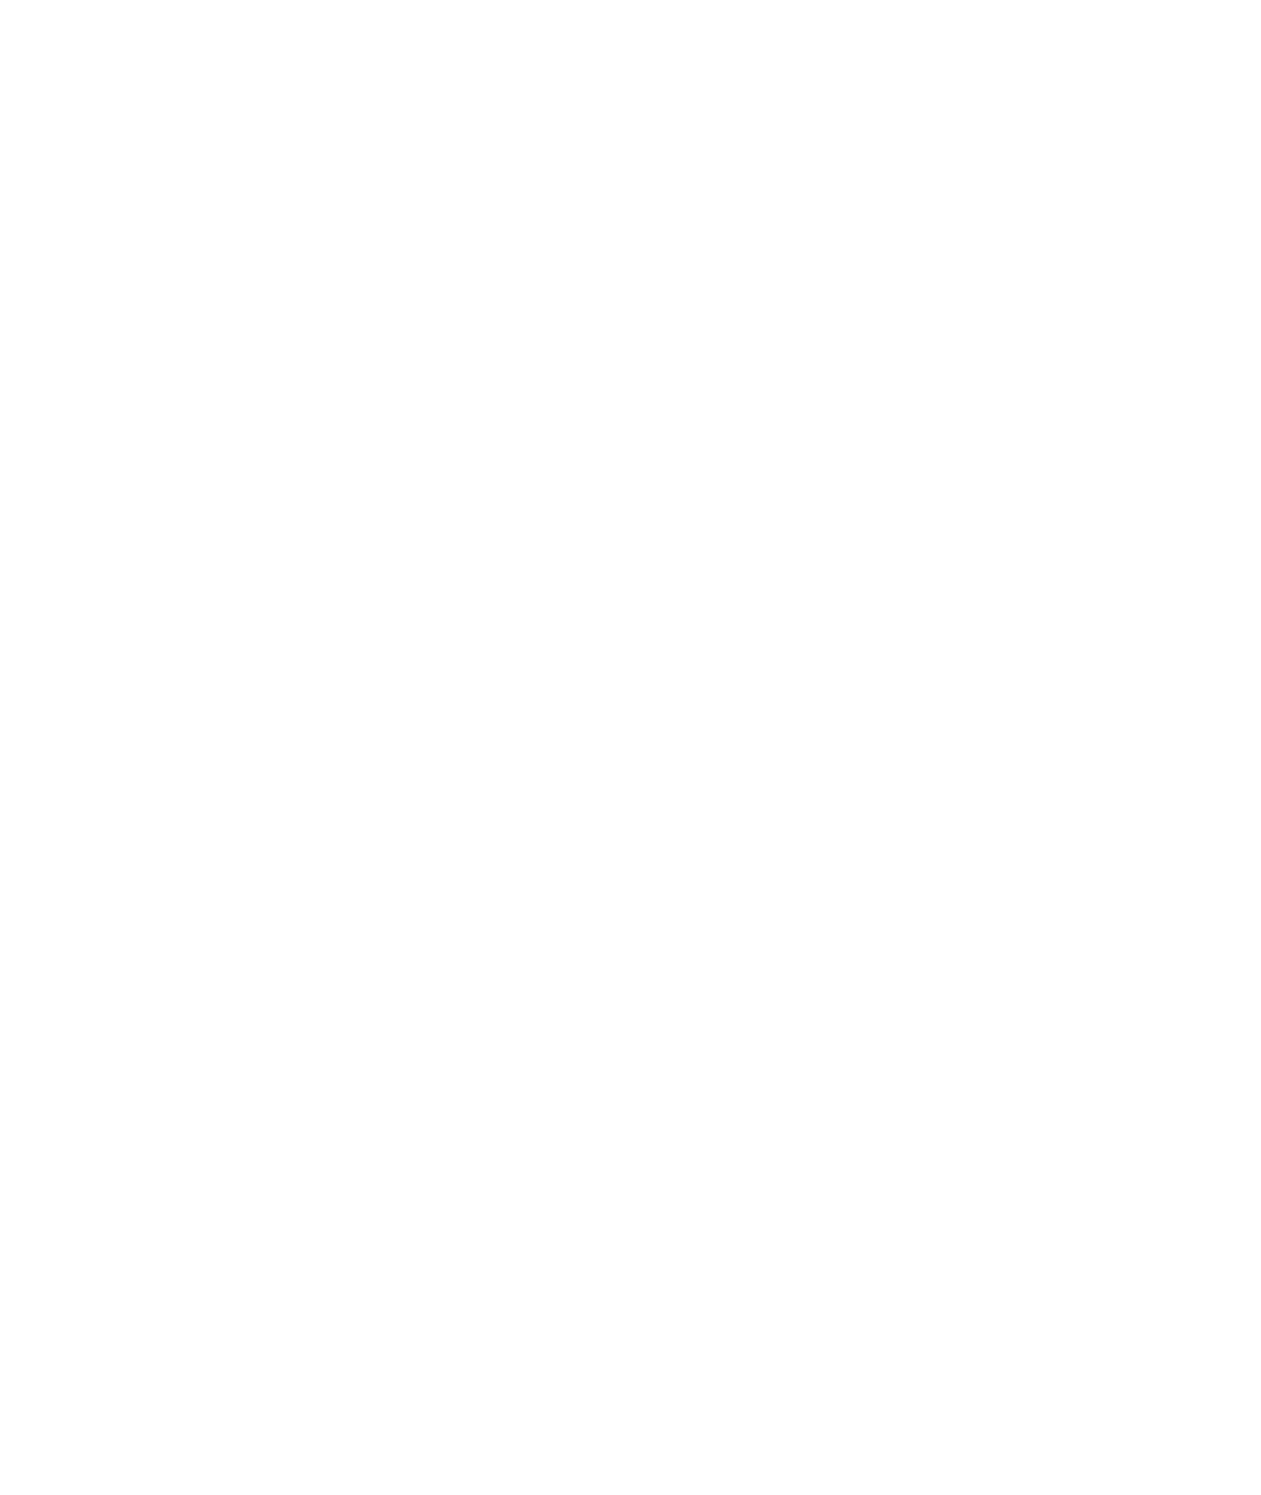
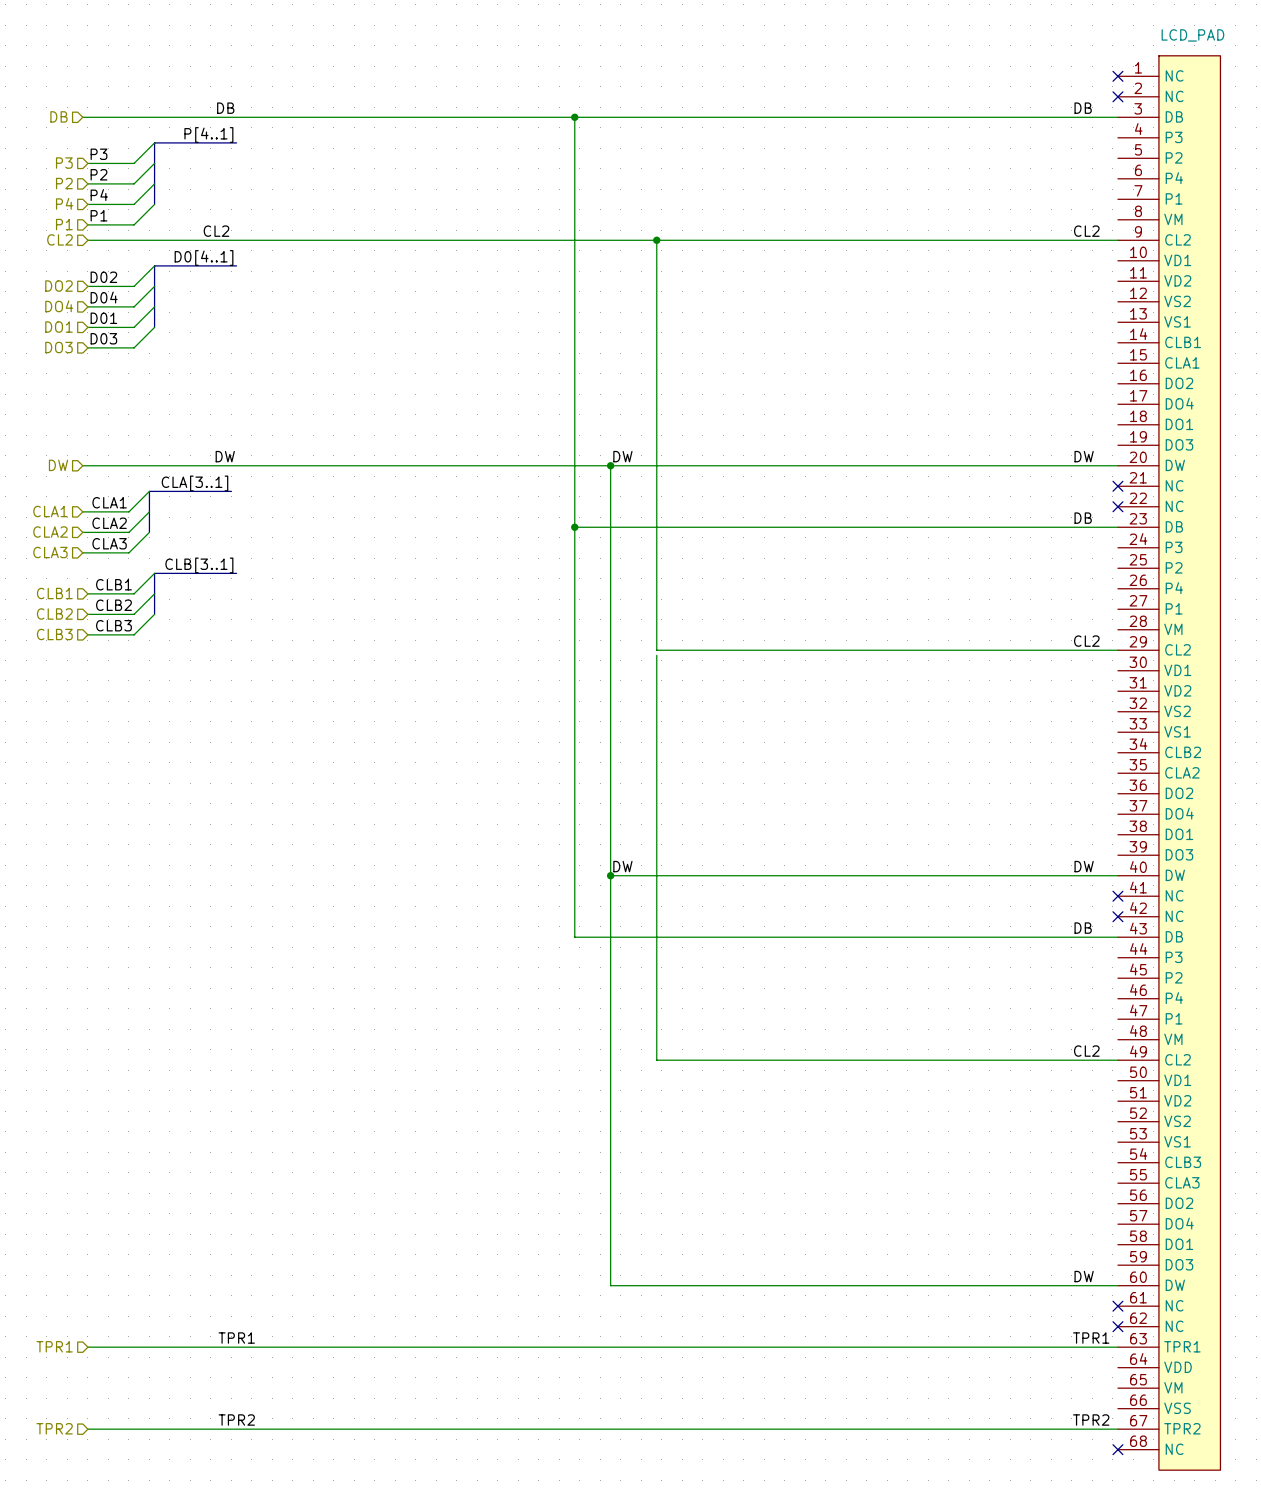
no-connect mark: none -> (1117, 76)
no-connect mark: none -> (1117, 96)
label: none -> DB (225, 108)
label: none -> DB (1083, 108)
hierarchical label: none -> DB (58, 116)
wire: none -> (82, 117) (1117, 117)
wire: none -> (574, 117) (574, 937) (1117, 937)
junction: none -> (574, 117)
label: none -> P[4..1] (208, 135)
wire: none -> (154, 142) (134, 163) (87, 163)
bus: none -> (236, 142) (154, 142) (154, 204)
label: none -> P3 (99, 154)
hierarchical label: none -> P3 (64, 163)
wire: none -> (154, 163) (134, 183) (87, 183)
label: none -> P2 (99, 174)
hierarchical label: none -> P2 (64, 183)
wire: none -> (154, 183) (134, 204) (87, 204)
label: none -> P4 (99, 195)
hierarchical label: none -> P4 (64, 203)
wire: none -> (154, 204) (134, 224) (87, 224)
label: none -> P1 (99, 215)
hierarchical label: none -> P1 (64, 224)
label: none -> CL2 (216, 231)
label: none -> CL2 (1086, 231)
hierarchical label: none -> CL2 (59, 239)
wire: none -> (87, 240) (1117, 240)
wire: none -> (656, 240) (656, 650) (1117, 650)
junction: none -> (656, 240)
label: none -> D0[4..1] (204, 257)
wire: none -> (154, 265) (134, 286) (87, 286)
bus: none -> (236, 265) (154, 265) (154, 327)
label: none -> D02 (103, 277)
hierarchical label: none -> DO2 (58, 286)
wire: none -> (154, 286) (134, 306) (87, 306)
label: none -> D04 (104, 297)
hierarchical label: none -> DO4 (59, 306)
wire: none -> (154, 306) (134, 327) (87, 327)
label: none -> D01 (103, 318)
hierarchical label: none -> DO1 (58, 327)
wire: none -> (154, 327) (134, 347) (87, 347)
label: none -> D03 (103, 338)
hierarchical label: none -> DO3 (58, 347)
label: none -> DW (225, 456)
label: none -> DW (622, 456)
label: none -> DW (1084, 456)
hierarchical label: none -> DW (58, 465)
wire: none -> (82, 465) (1117, 465)
wire: none -> (610, 465) (610, 1285) (1117, 1285)
junction: none -> (610, 465)
label: none -> CLA[3..1] (194, 483)
no-connect mark: none -> (1117, 486)
wire: none -> (149, 491) (128, 511) (82, 511)
bus: none -> (231, 491) (149, 491) (149, 532)
label: none -> CLA1 (109, 502)
no-connect mark: none -> (1117, 506)
hierarchical label: none -> CLA1 (50, 511)
wire: none -> (149, 511) (128, 532) (82, 532)
label: none -> DB (1083, 518)
label: none -> CLA2 (109, 523)
wire: none -> (574, 527) (1117, 527)
junction: none -> (574, 527)
hierarchical label: none -> CLA2 (50, 532)
wire: none -> (149, 532) (128, 552) (82, 552)
label: none -> CLA3 (109, 543)
hierarchical label: none -> CLA3 (50, 552)
label: none -> CLB[3..1] (199, 565)
wire: none -> (154, 573) (134, 593) (87, 593)
bus: none -> (236, 573) (154, 573) (154, 614)
label: none -> CLB1 (113, 584)
hierarchical label: none -> CLB1 (54, 593)
wire: none -> (154, 593) (134, 614) (87, 614)
label: none -> CLB2 (113, 605)
hierarchical label: none -> CLB2 (54, 613)
wire: none -> (154, 614) (134, 634) (87, 634)
label: none -> CLB3 (113, 625)
hierarchical label: none -> CLB3 (54, 634)
label: none -> CL2 (1086, 641)
wire: none -> (656, 655) (656, 1060) (1117, 1060)
LCD_PAD: none -> (1169, 762)
label: none -> DW (622, 866)
label: none -> DW (1084, 866)
wire: none -> (610, 875) (1117, 875)
junction: none -> (610, 875)
no-connect mark: none -> (1117, 896)
no-connect mark: none -> (1117, 916)
label: none -> DB (1083, 928)
label: none -> CL2 (1086, 1051)
label: none -> DW (1084, 1276)
no-connect mark: none -> (1117, 1306)
no-connect mark: none -> (1117, 1326)
label: none -> TPR1 (236, 1338)
label: none -> TPR1 (1091, 1338)
hierarchical label: none -> TPR1 (54, 1346)
wire: none -> (87, 1347) (1117, 1347)
label: none -> TPR2 (236, 1420)
label: none -> TPR2 (1091, 1420)
hierarchical label: none -> TPR2 (54, 1428)
wire: none -> (87, 1429) (1117, 1429)
no-connect mark: none -> (1117, 1449)

